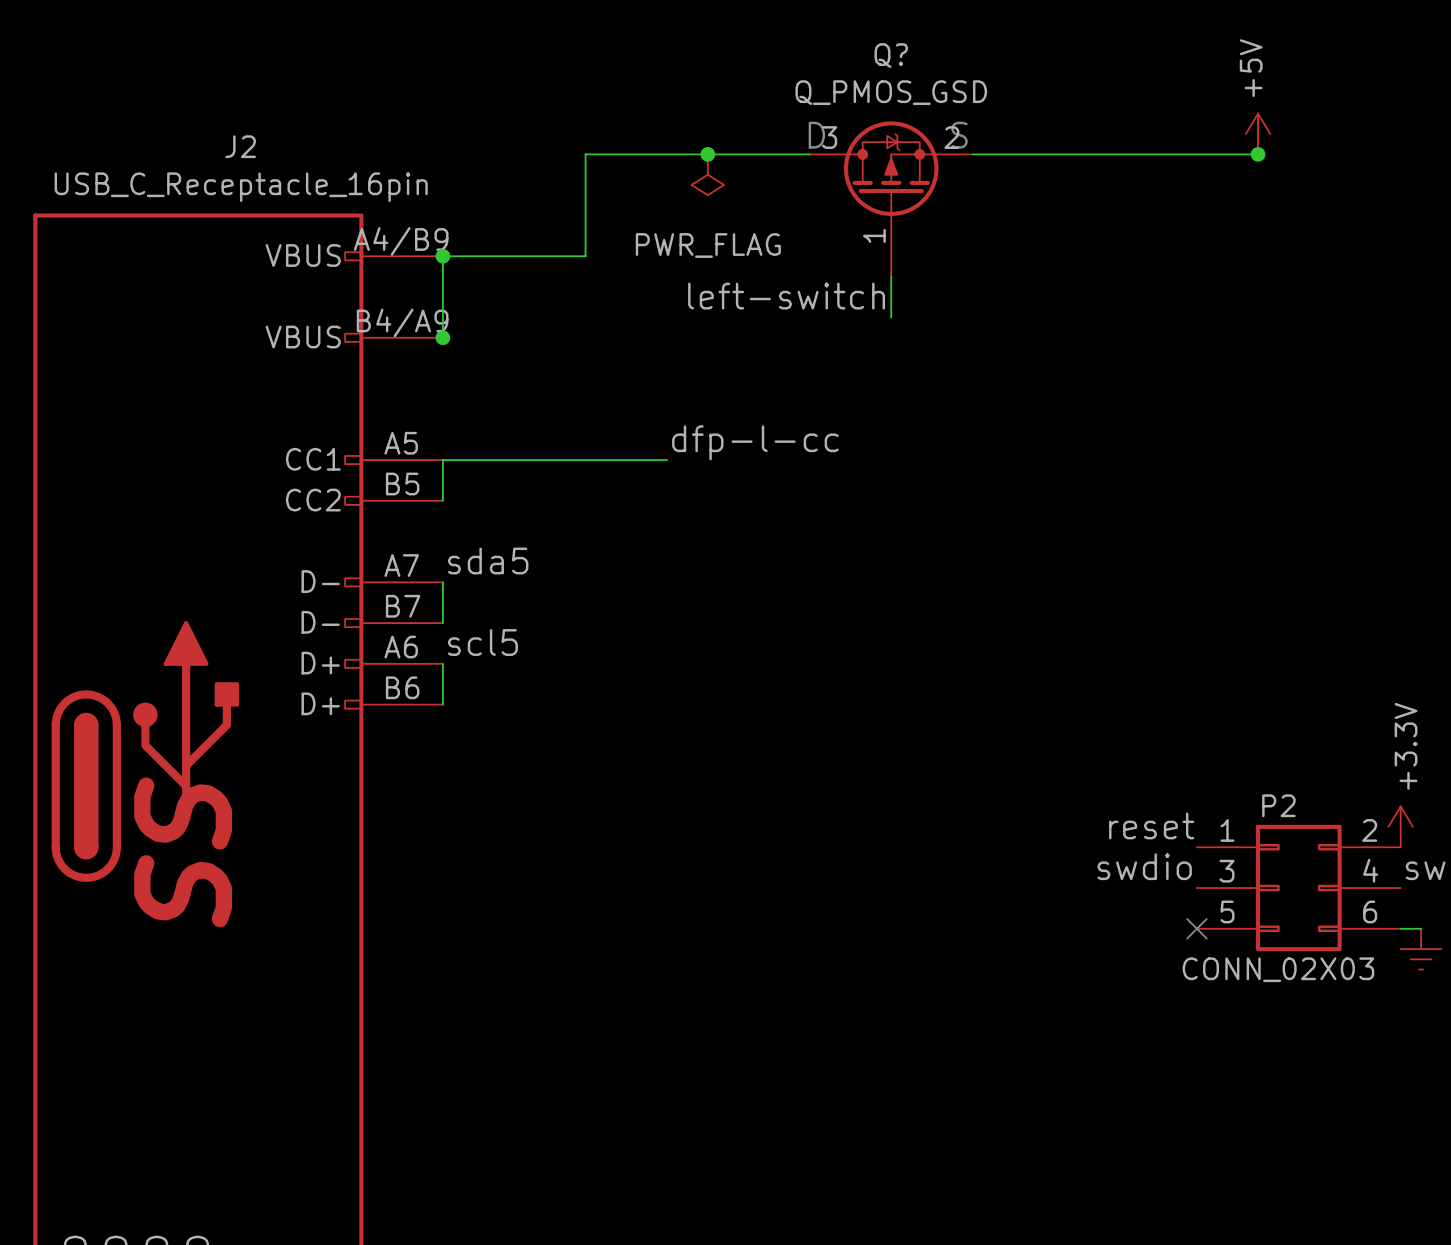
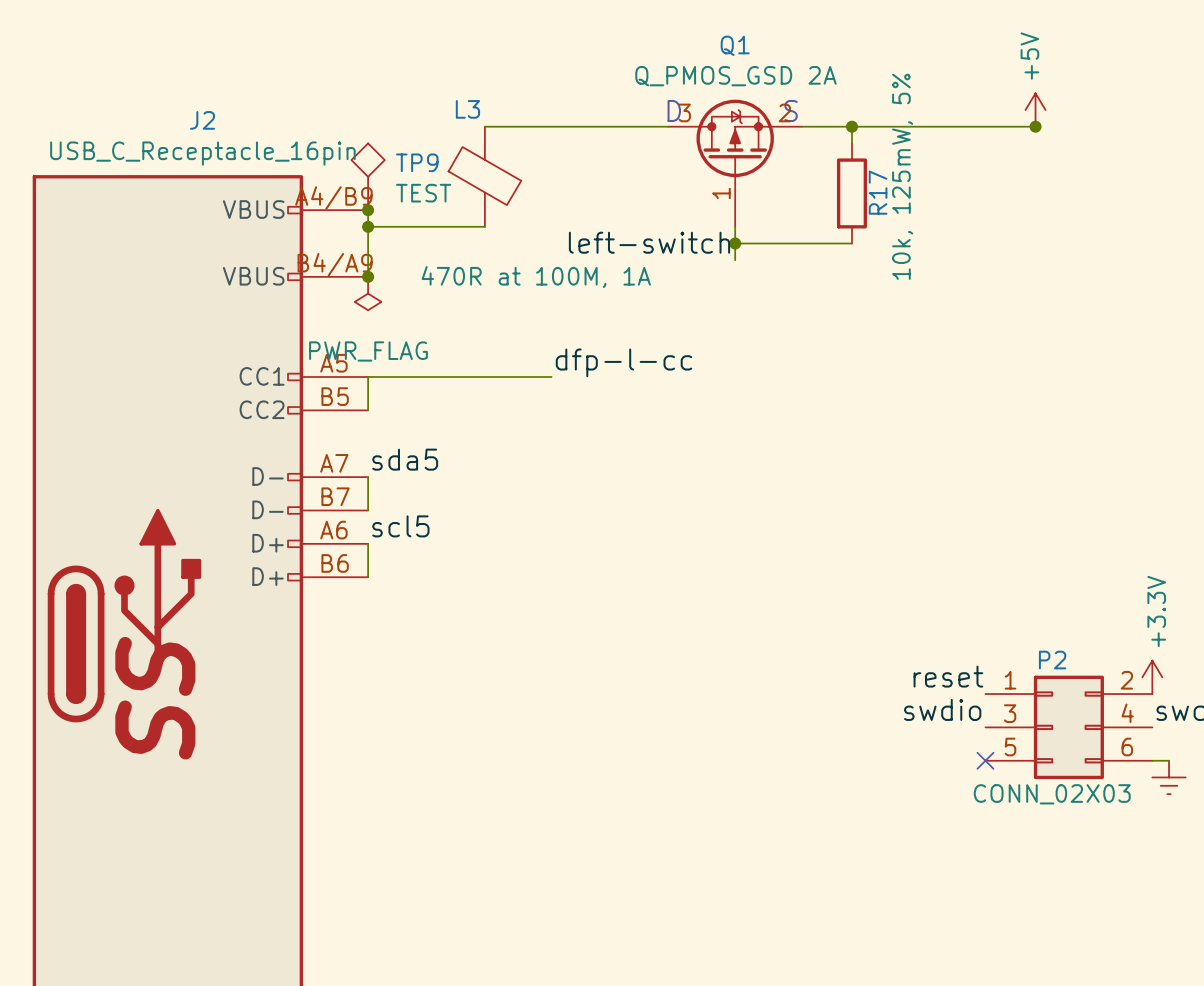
Q? name: Q? (891, 55) -> Q1 (735, 45)
Q? value: Q_PMOS_GSD (891, 92) -> Q_PMOS_GSD 2A (735, 76)
wire: (585, 154) (585, 256) (442, 256) -> none
junction: (707, 154) -> none
wire: none -> (851, 126) (851, 143)
junction: none -> (851, 126)
power symbol position: PWR_FLAG (707, 174) -> PWR_FLAG (368, 293)
TP9: none -> TEST (368, 176)
L3: none -> 470R at 100M, 1A (484, 176)
R17: none -> 10k, 125mW, 5% (851, 193)
wire: none -> (368, 226) (484, 226)
junction: none -> (368, 226)
wire: none -> (735, 243) (851, 243)
junction: none -> (735, 243)

